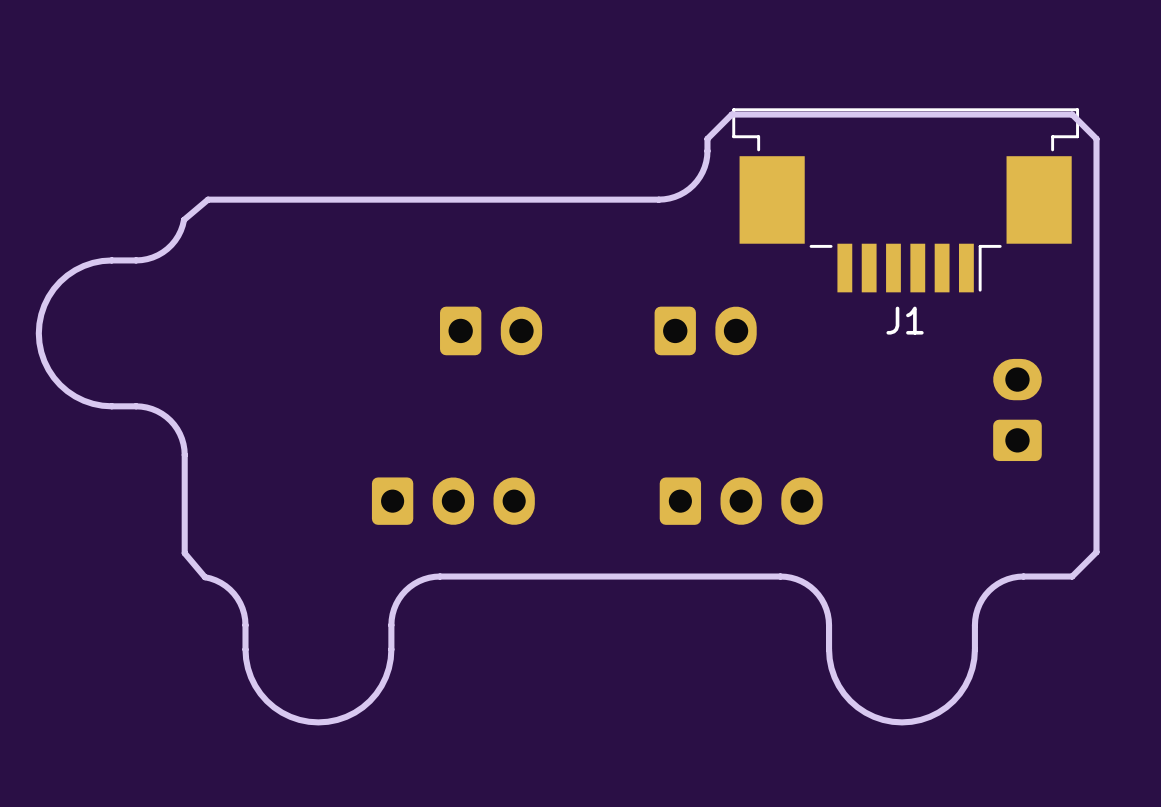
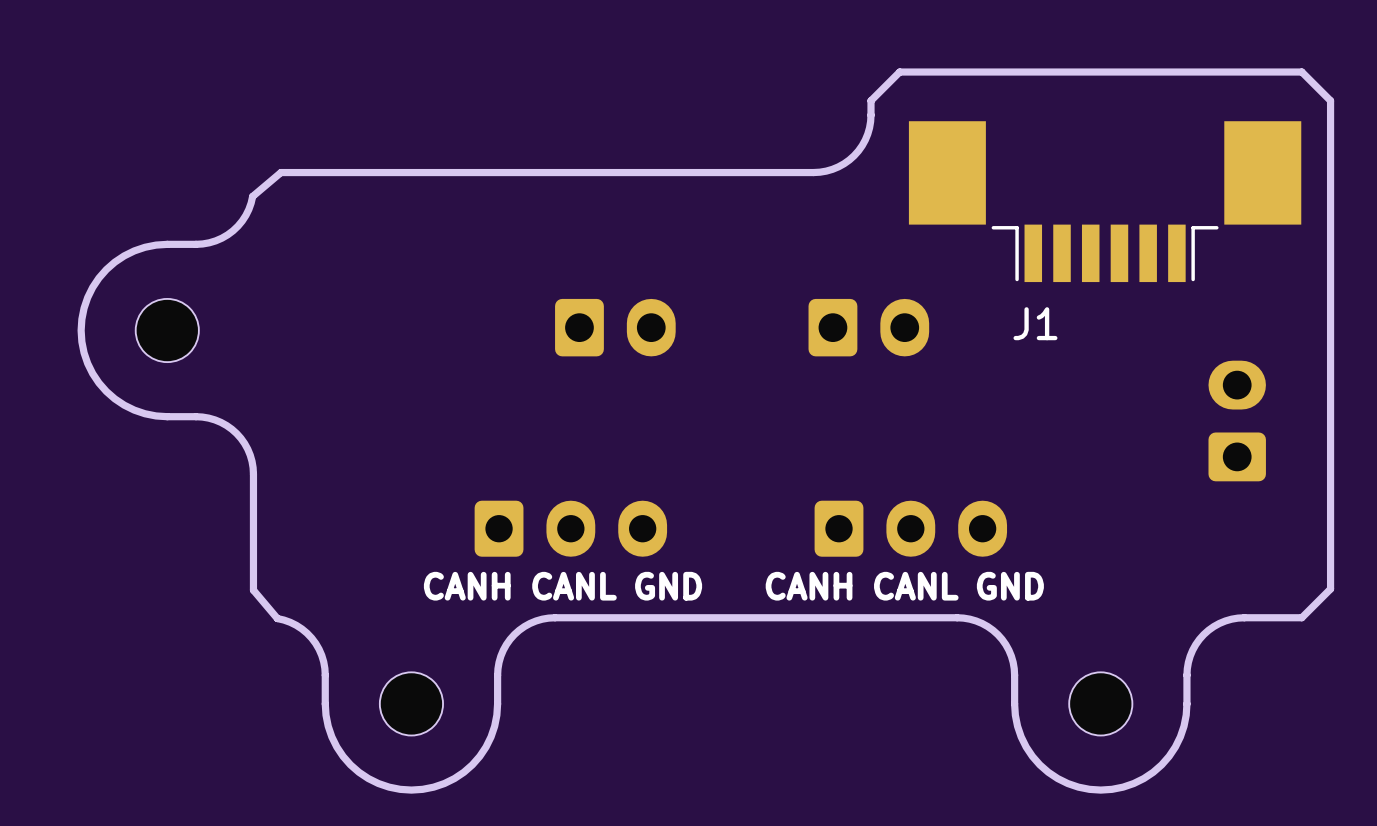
J1 footprint: [732, 108, 1079, 293] -> [908, 121, 1302, 283]
J1 name position: J1 (905, 320) -> J1 (1035, 323)
part: none -> (167, 330)
text: none -> CANH CANL GND (563, 586)
text: none -> CANH CANL GND (904, 586)
part: none -> (411, 703)
part: none -> (1100, 703)

